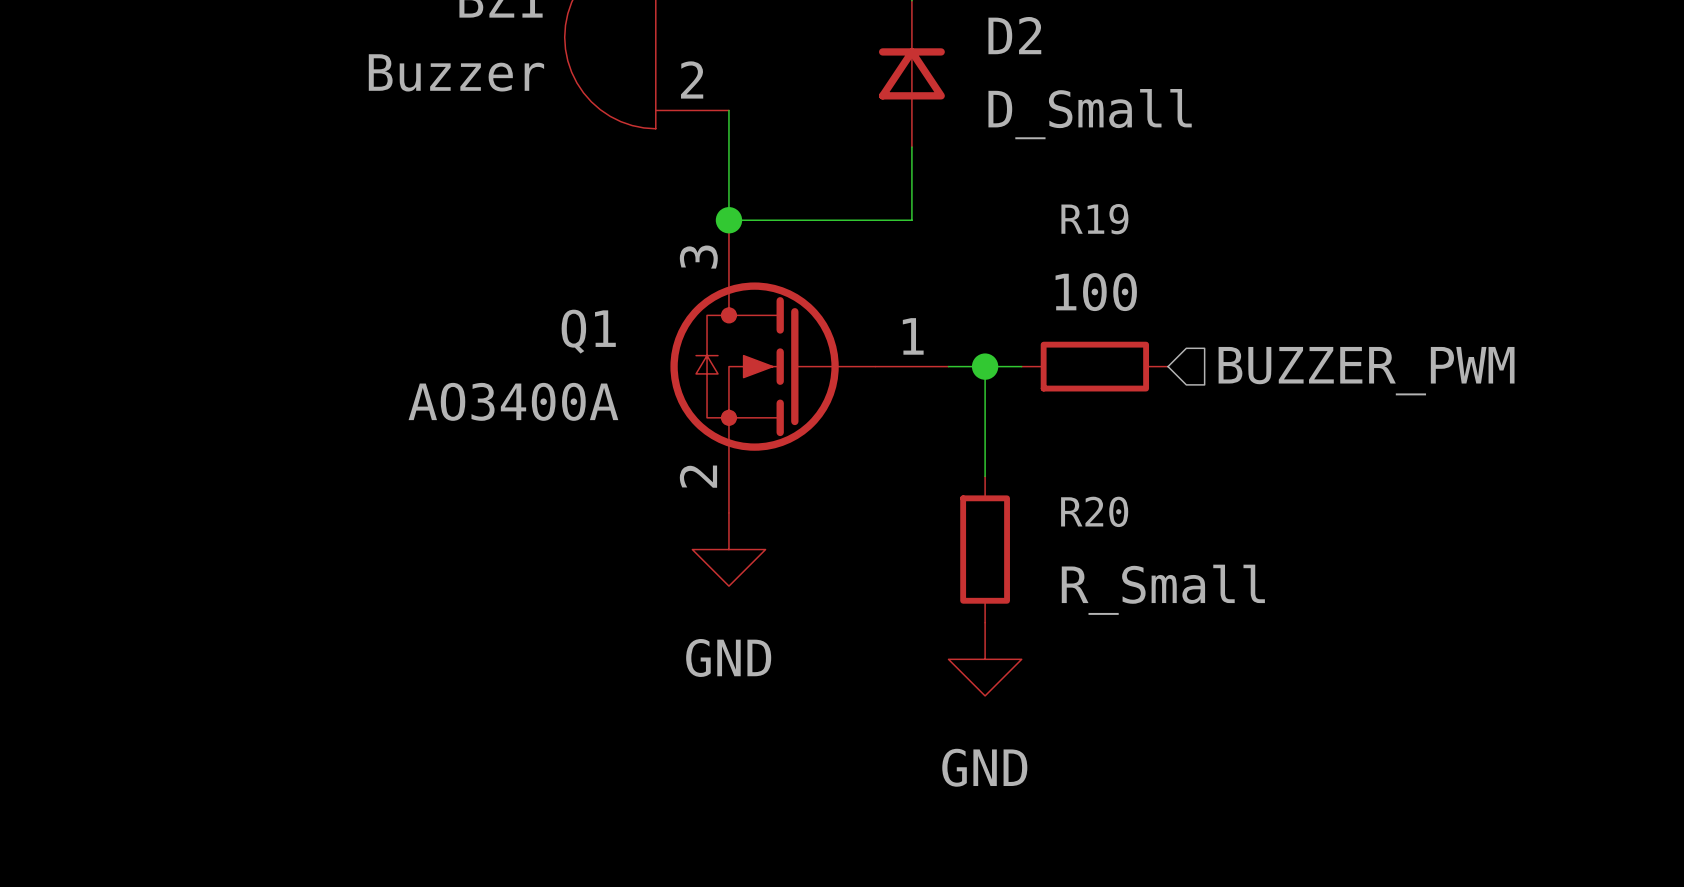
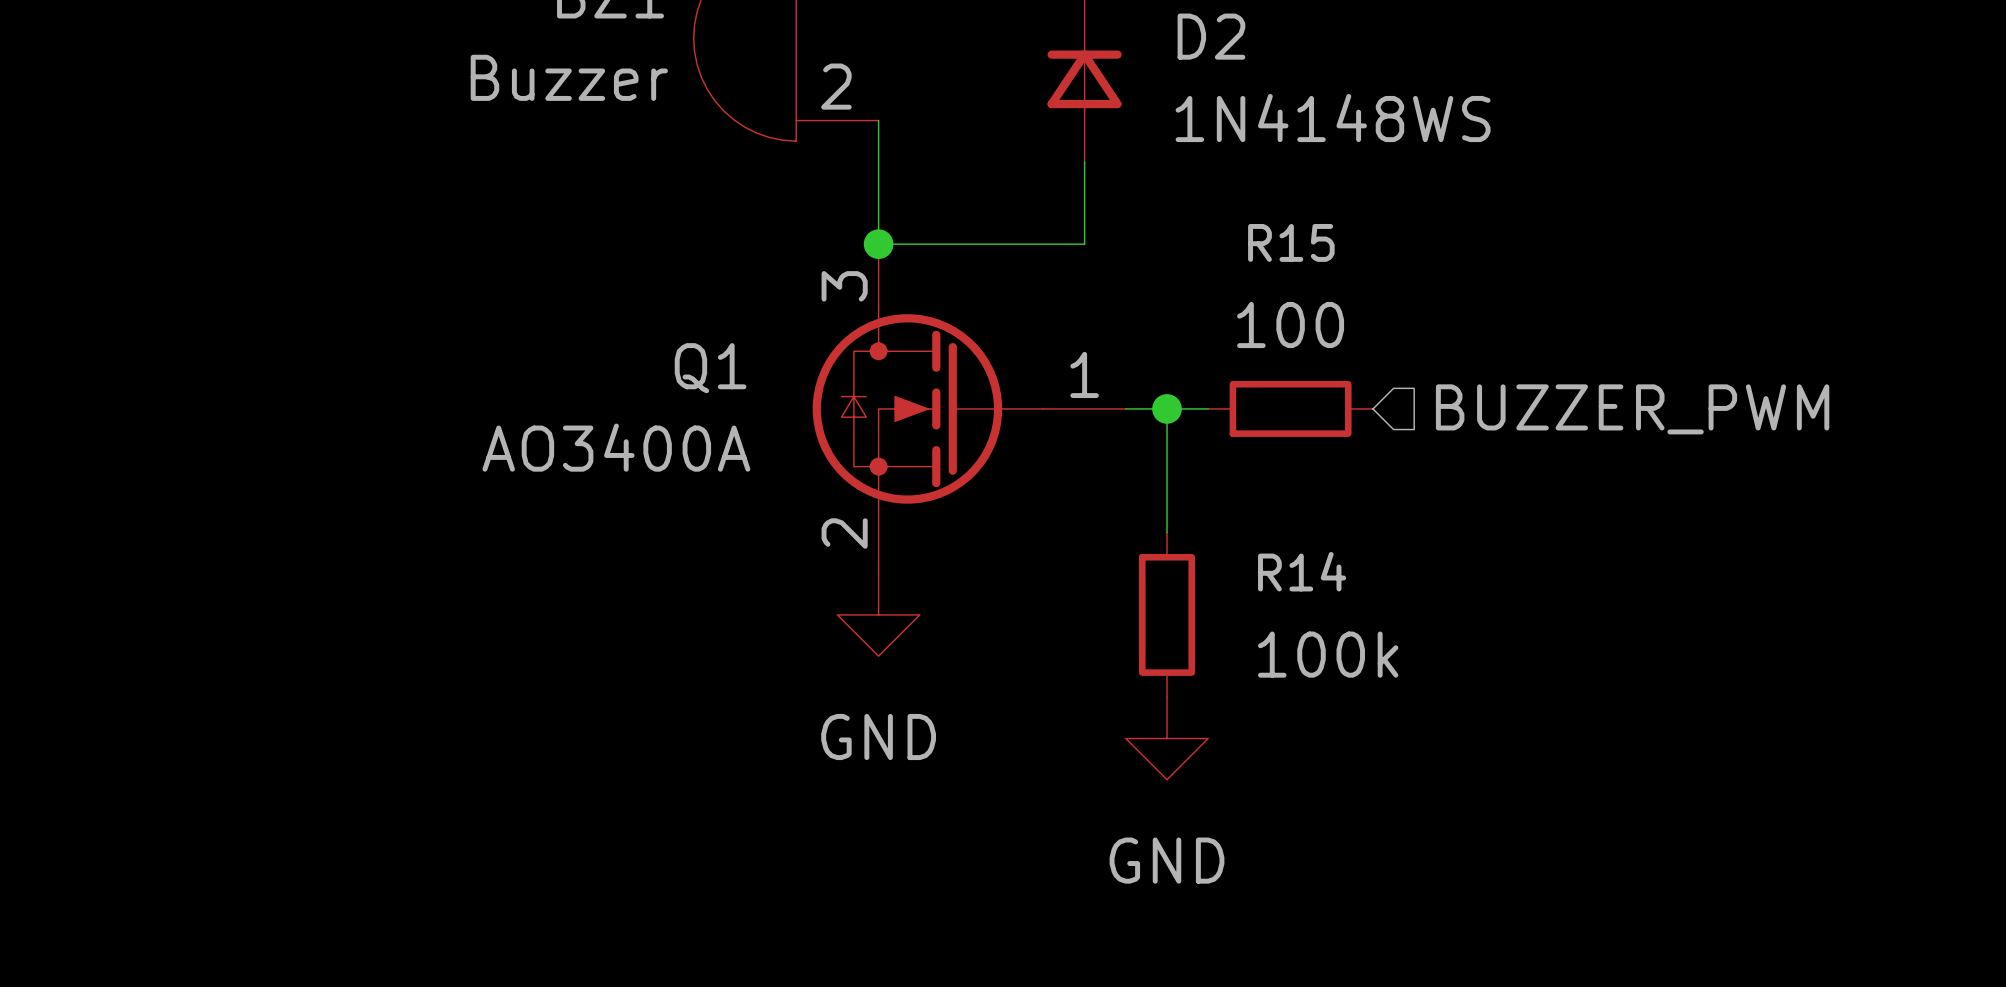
D2 value: D_Small (1090, 114) -> 1N4148WS (1333, 118)
R19 name: R19 (1094, 219) -> R15 (1291, 242)
R20 name: R20 (1094, 511) -> R14 (1302, 571)
R20 value: R_Small (1163, 589) -> 100k (1328, 654)

